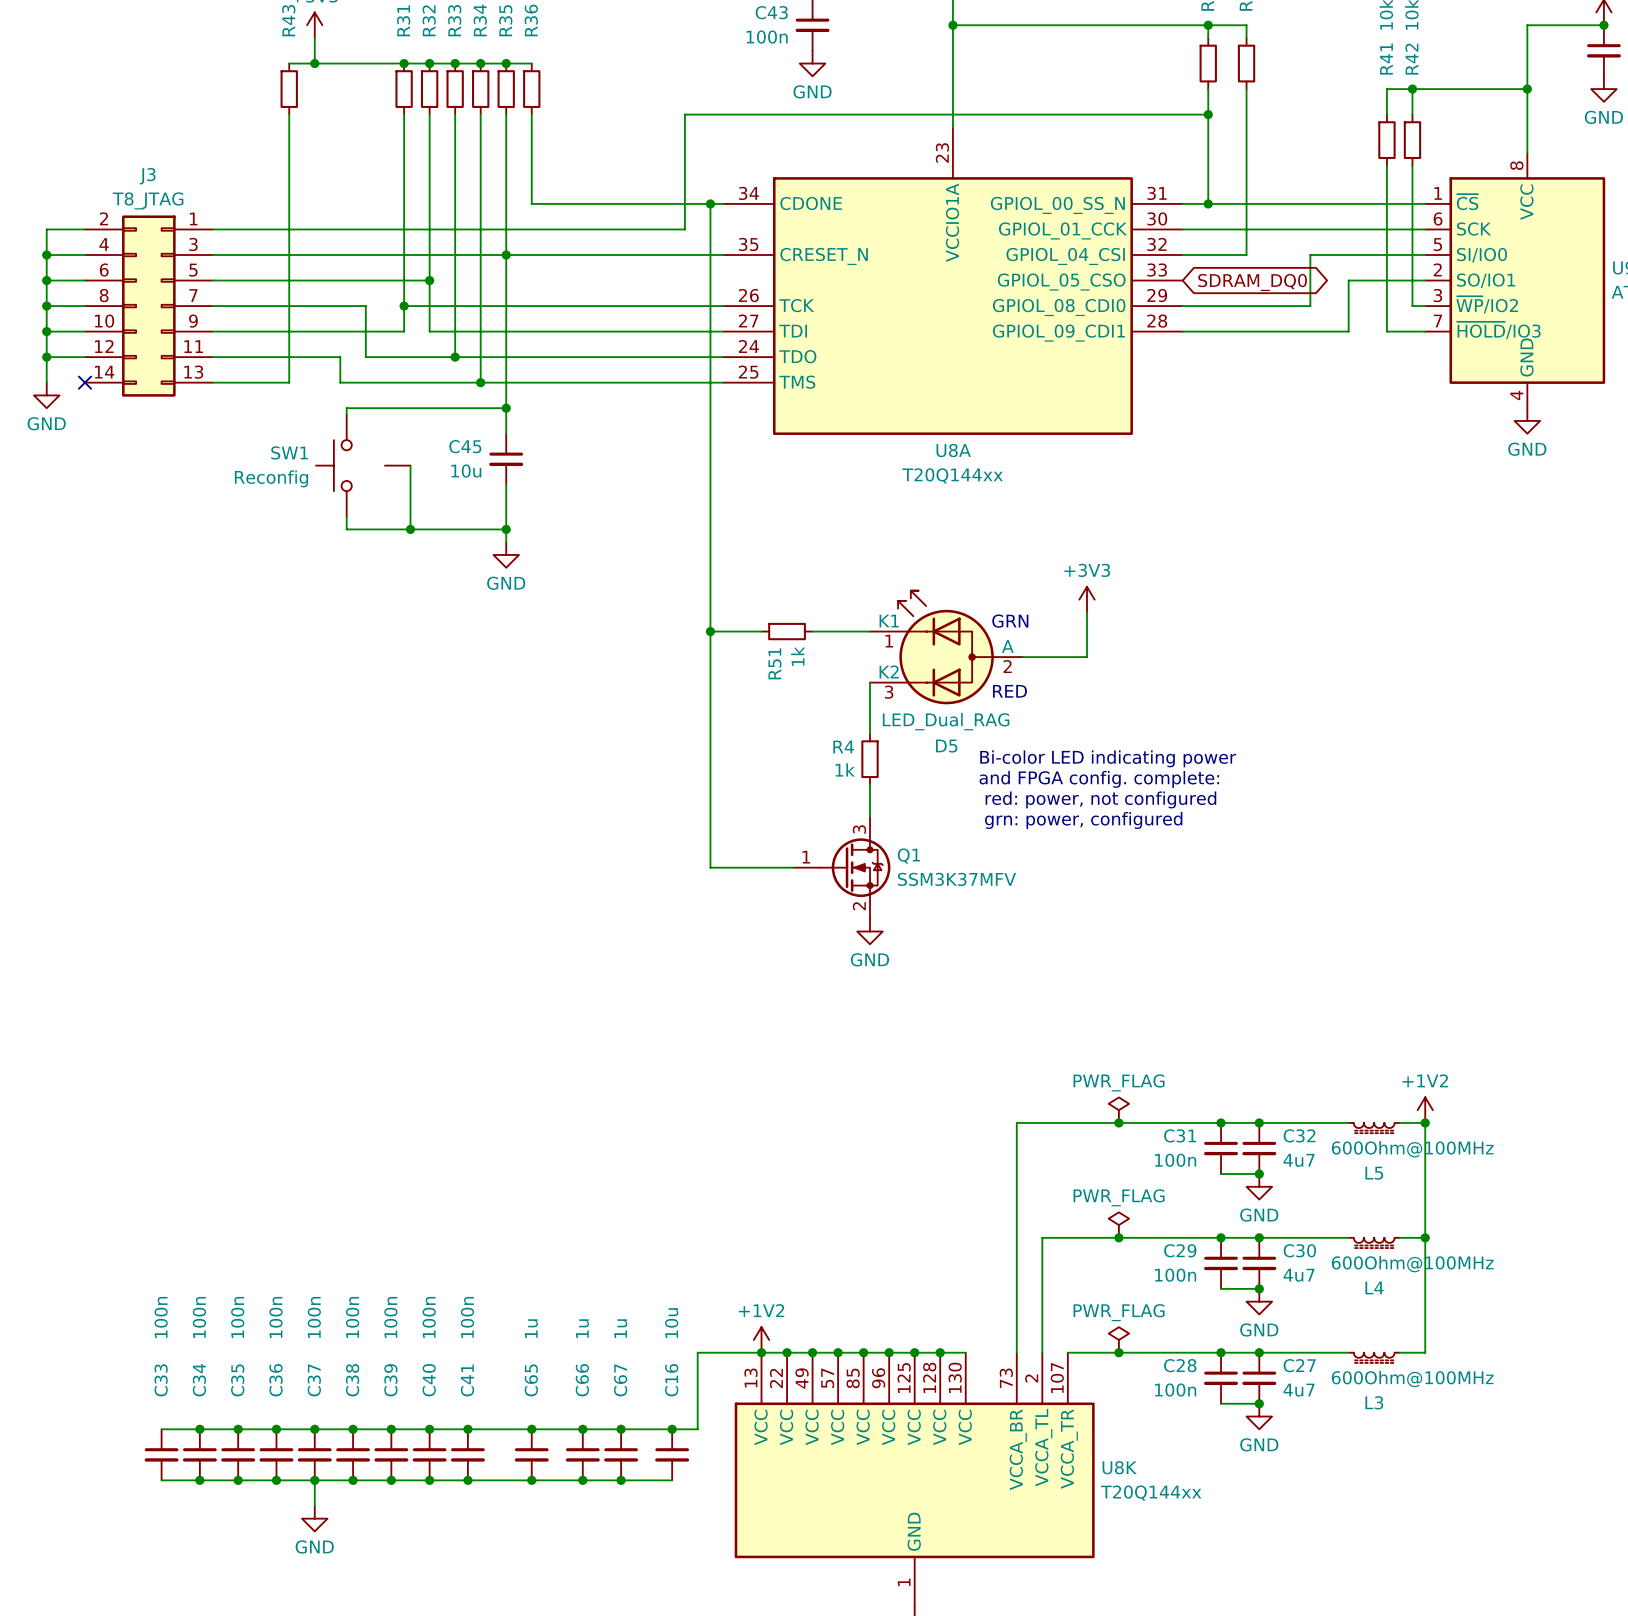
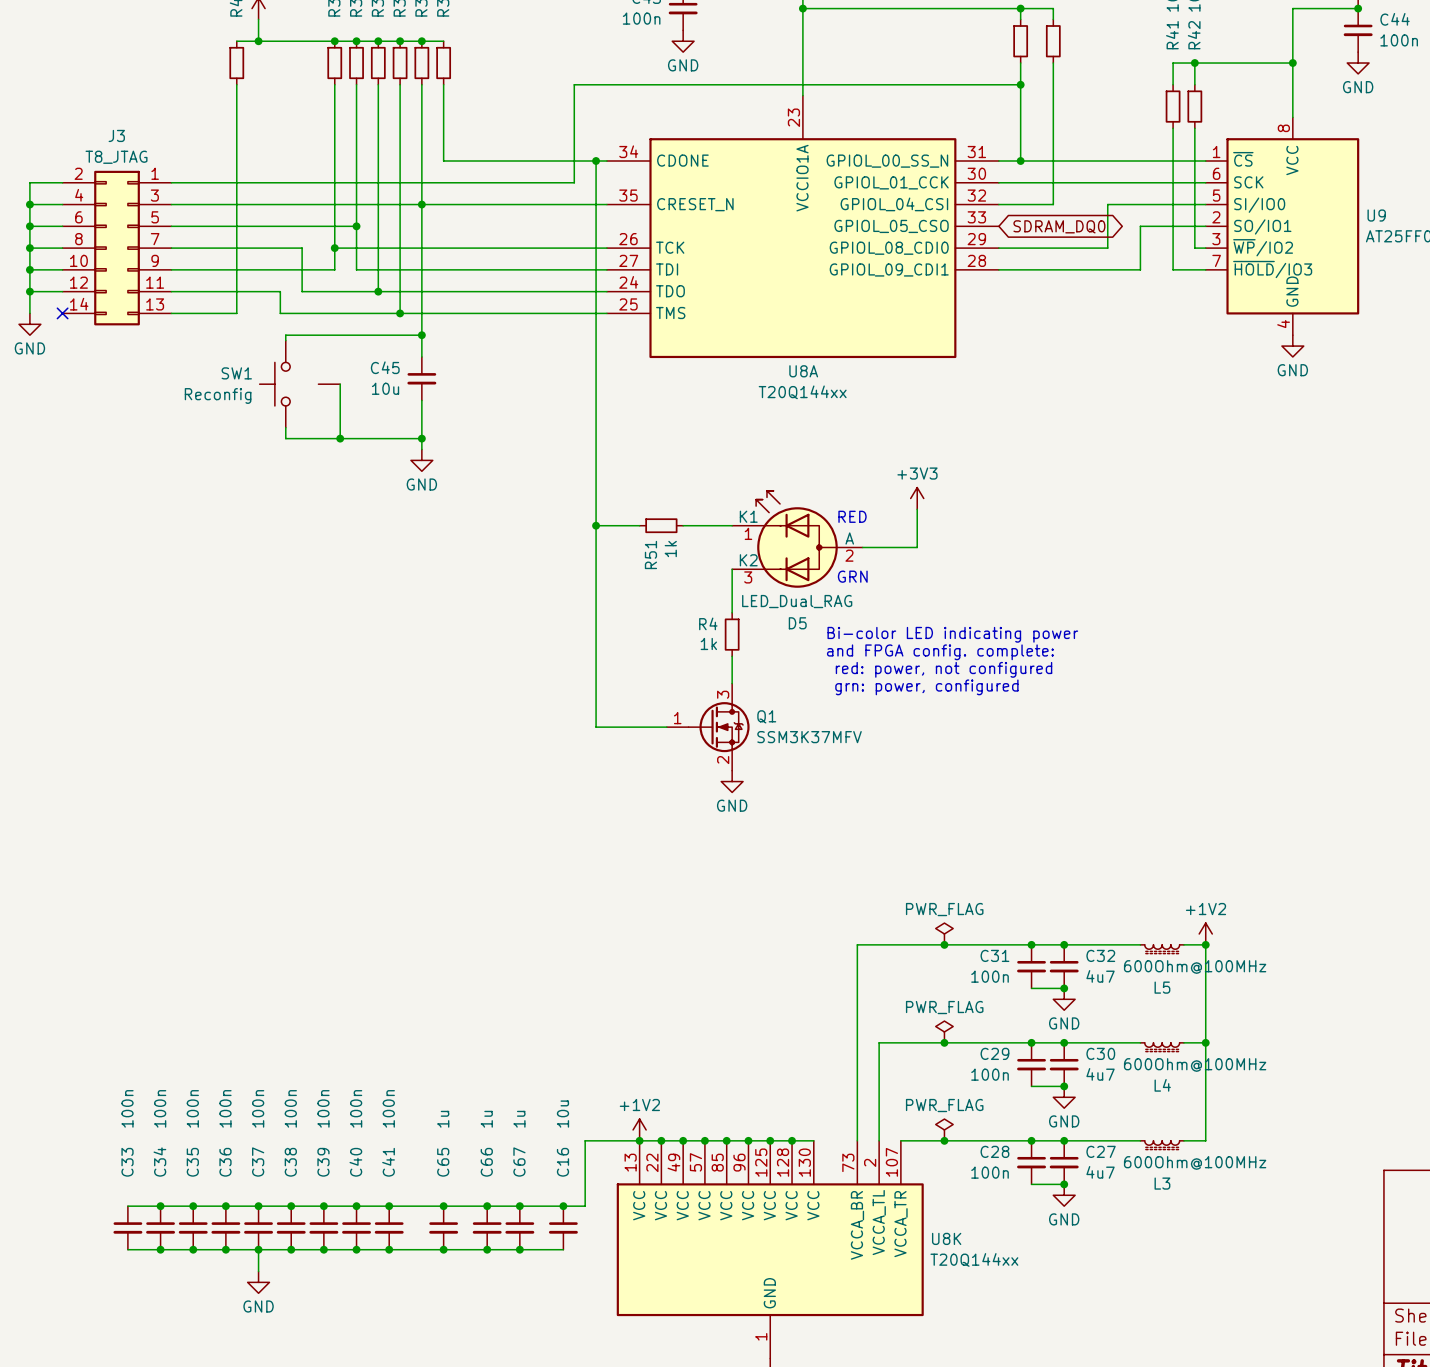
text: GRN (1010, 621) -> RED (852, 516)
text: RED (1009, 691) -> GRN (852, 576)

